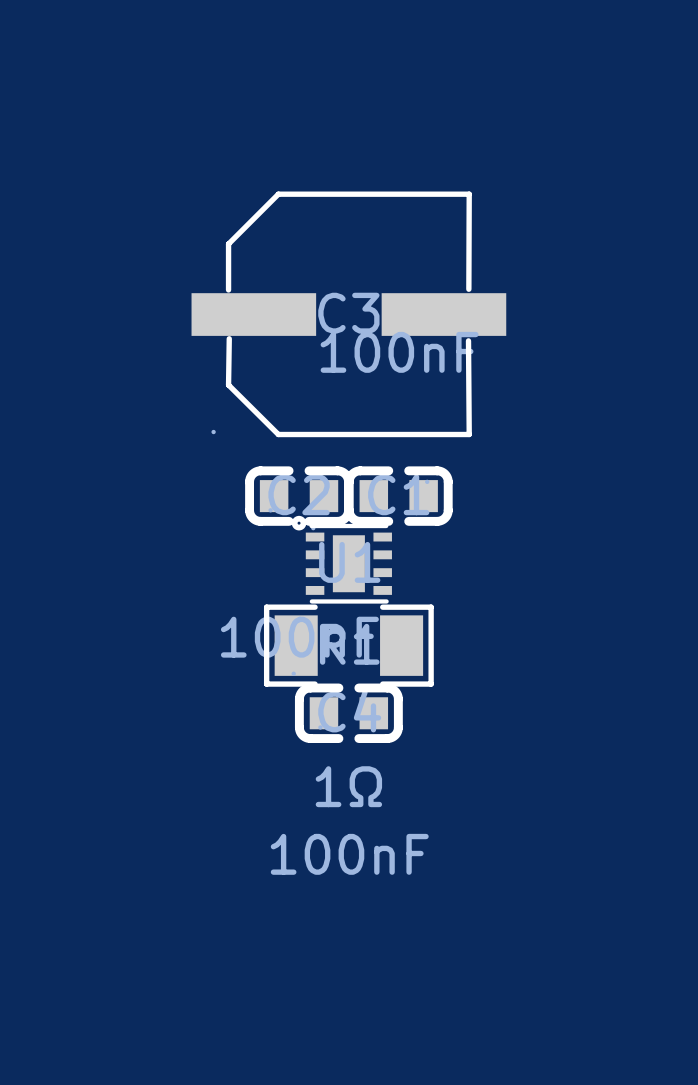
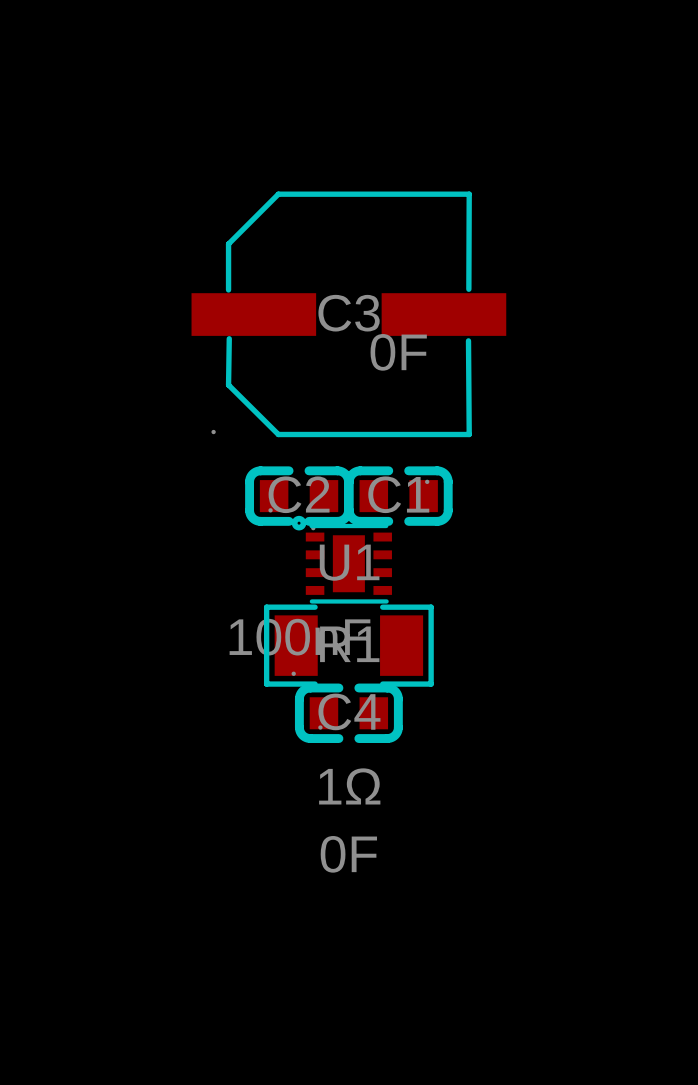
C1 value: 100nF (399, 352) -> 0F (398, 352)
C4 value: 100nF (349, 854) -> 0F (348, 854)

